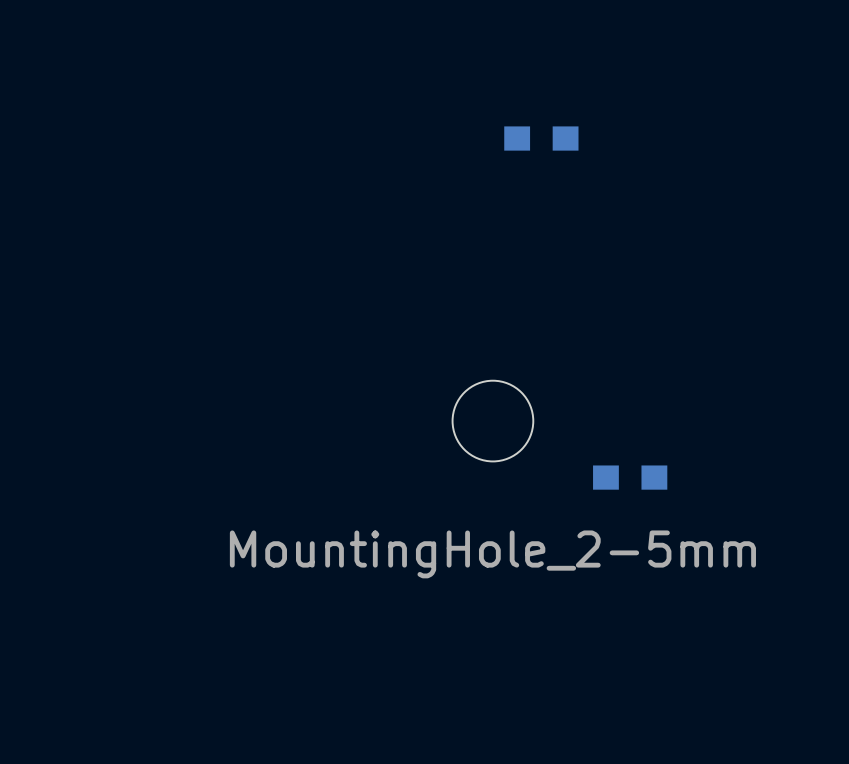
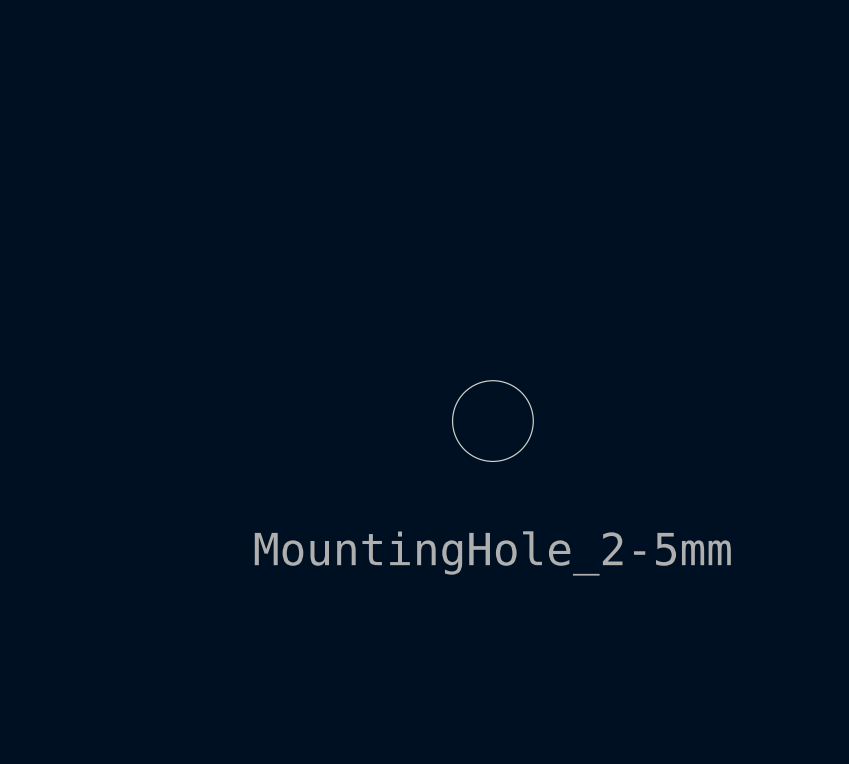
part: (541, 138) -> none
part: (630, 477) -> none

